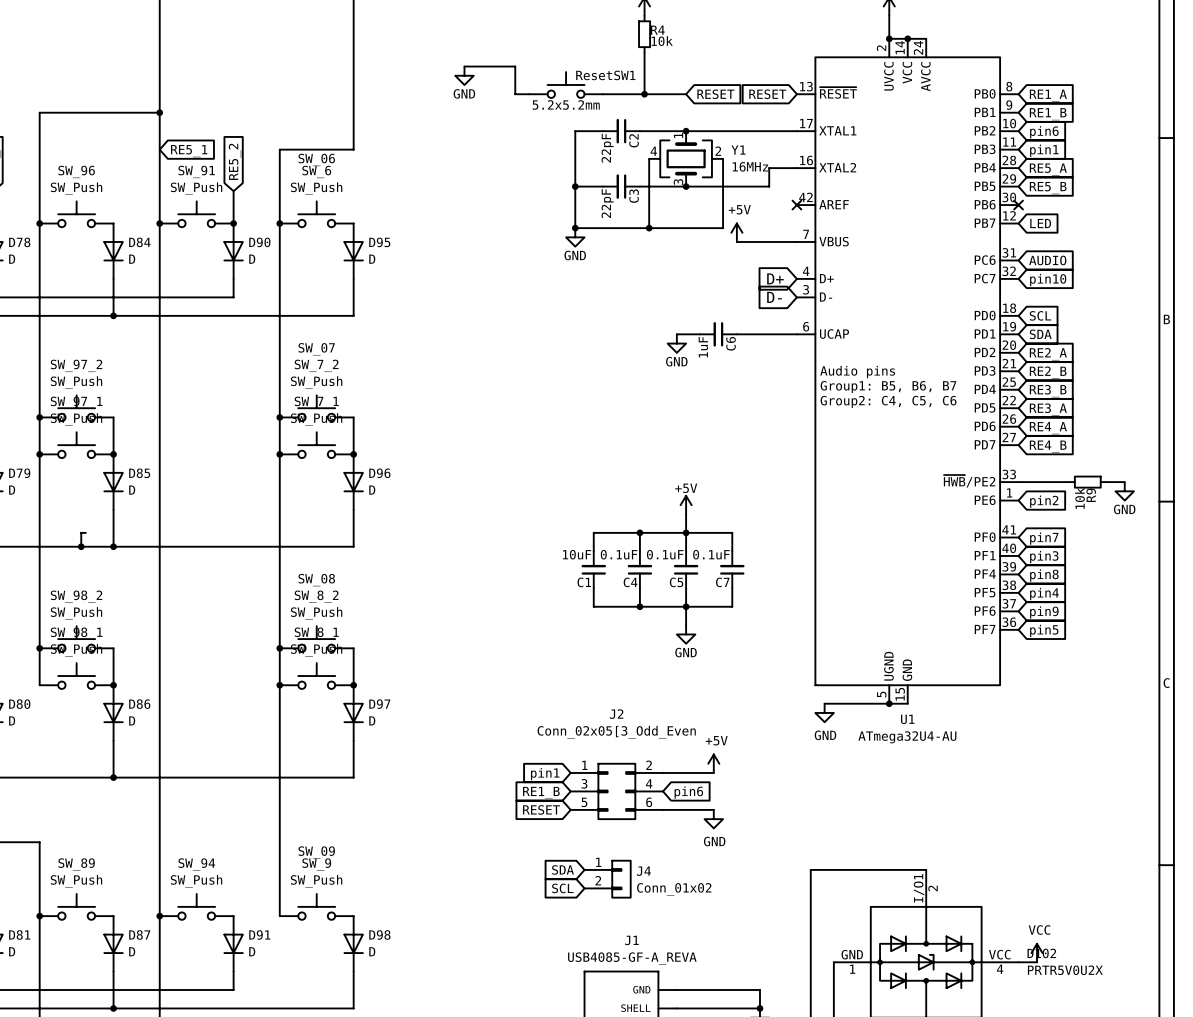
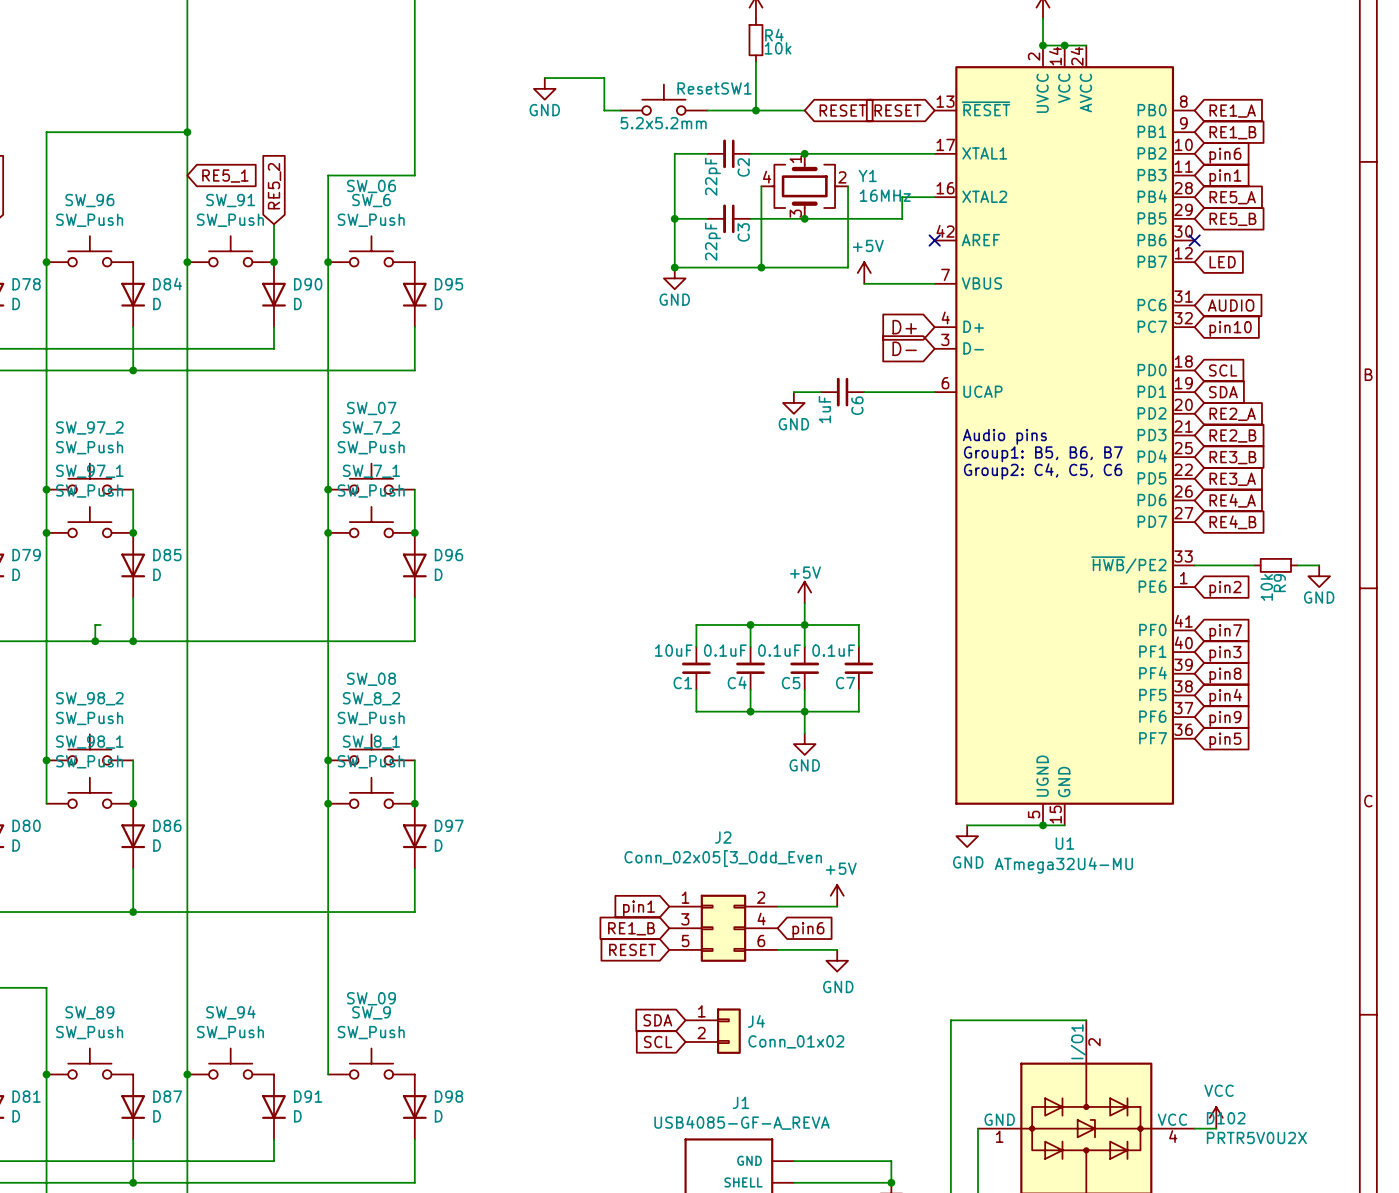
U1 value: ATmega32U4-AU (907, 737) -> ATmega32U4-MU (1063, 865)

